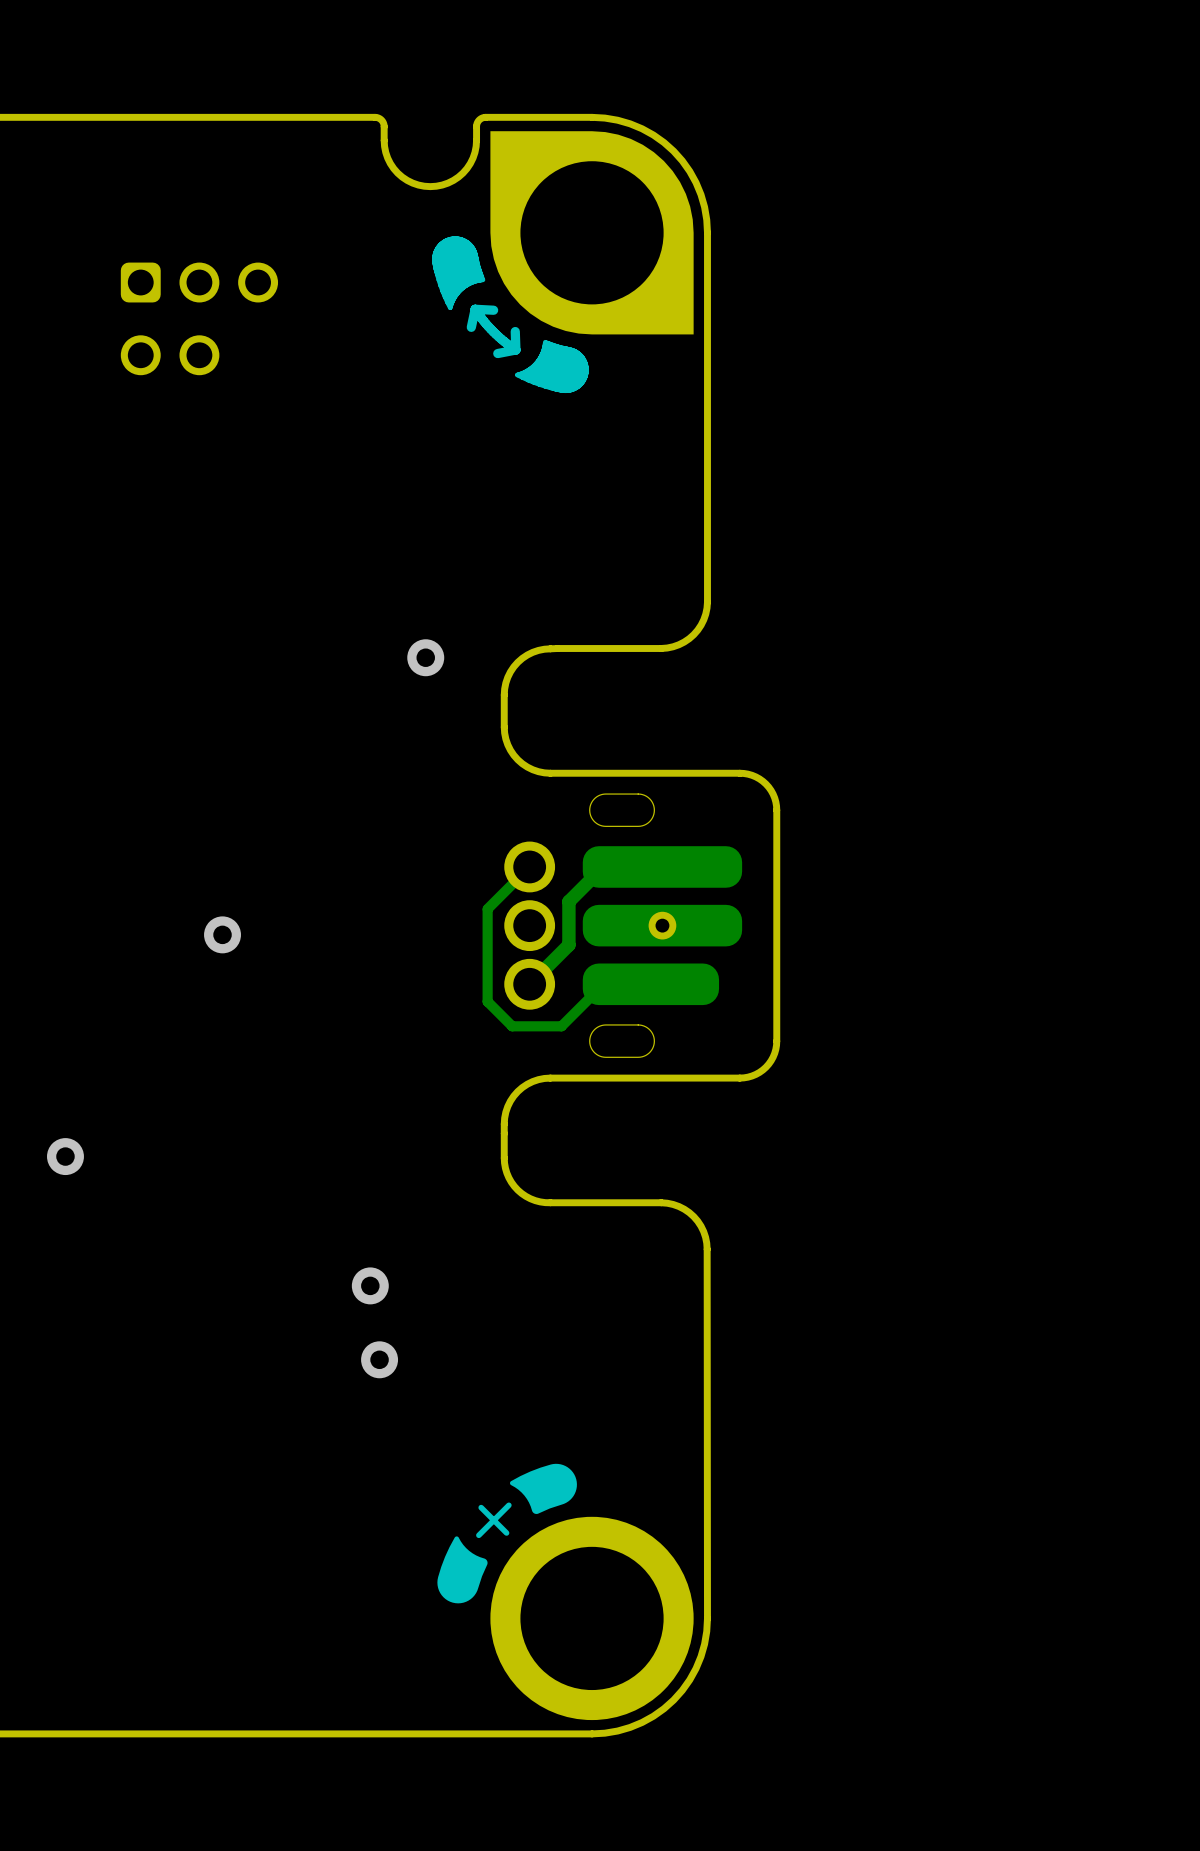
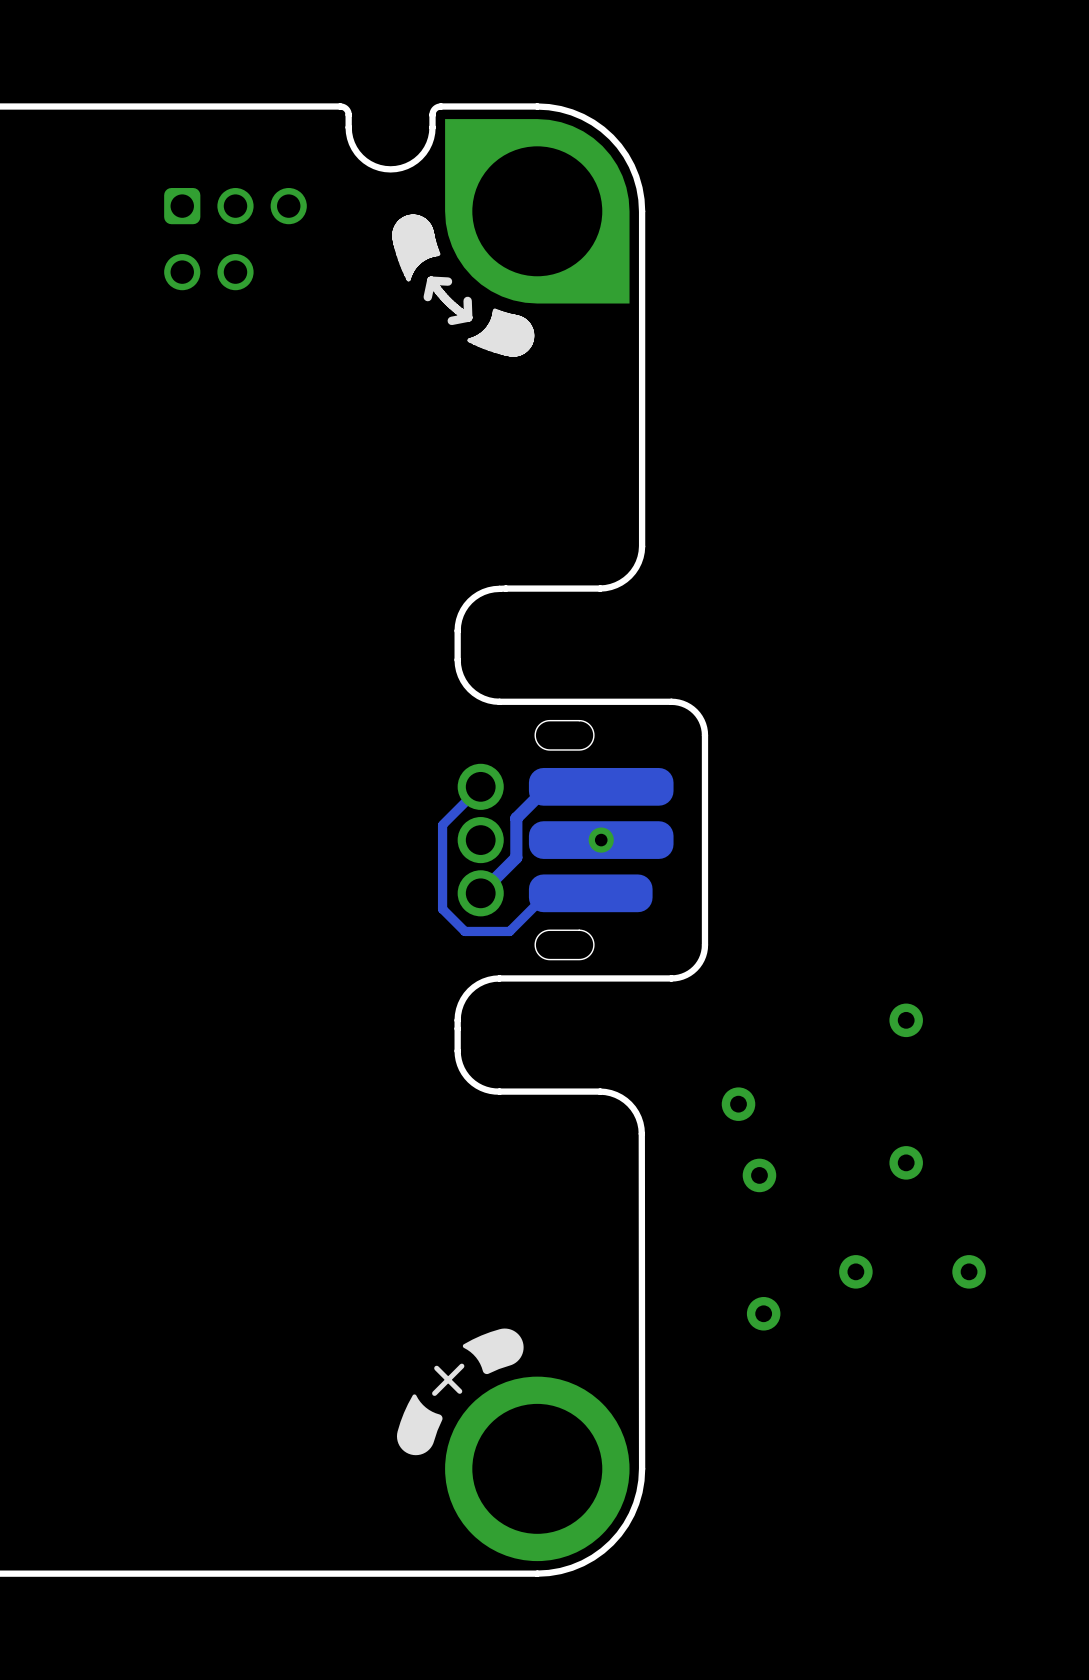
part position: (199, 318) -> (235, 239)
via: (425, 657) -> none
via: (222, 934) -> none
via: none -> (906, 1020)
via: (65, 1156) -> none
via: none -> (738, 1104)
via: none -> (906, 1162)
via: (370, 1285) -> none
via: none -> (759, 1175)
via: (379, 1359) -> none
via: none -> (855, 1271)
via: none -> (969, 1271)
via: none -> (763, 1313)

